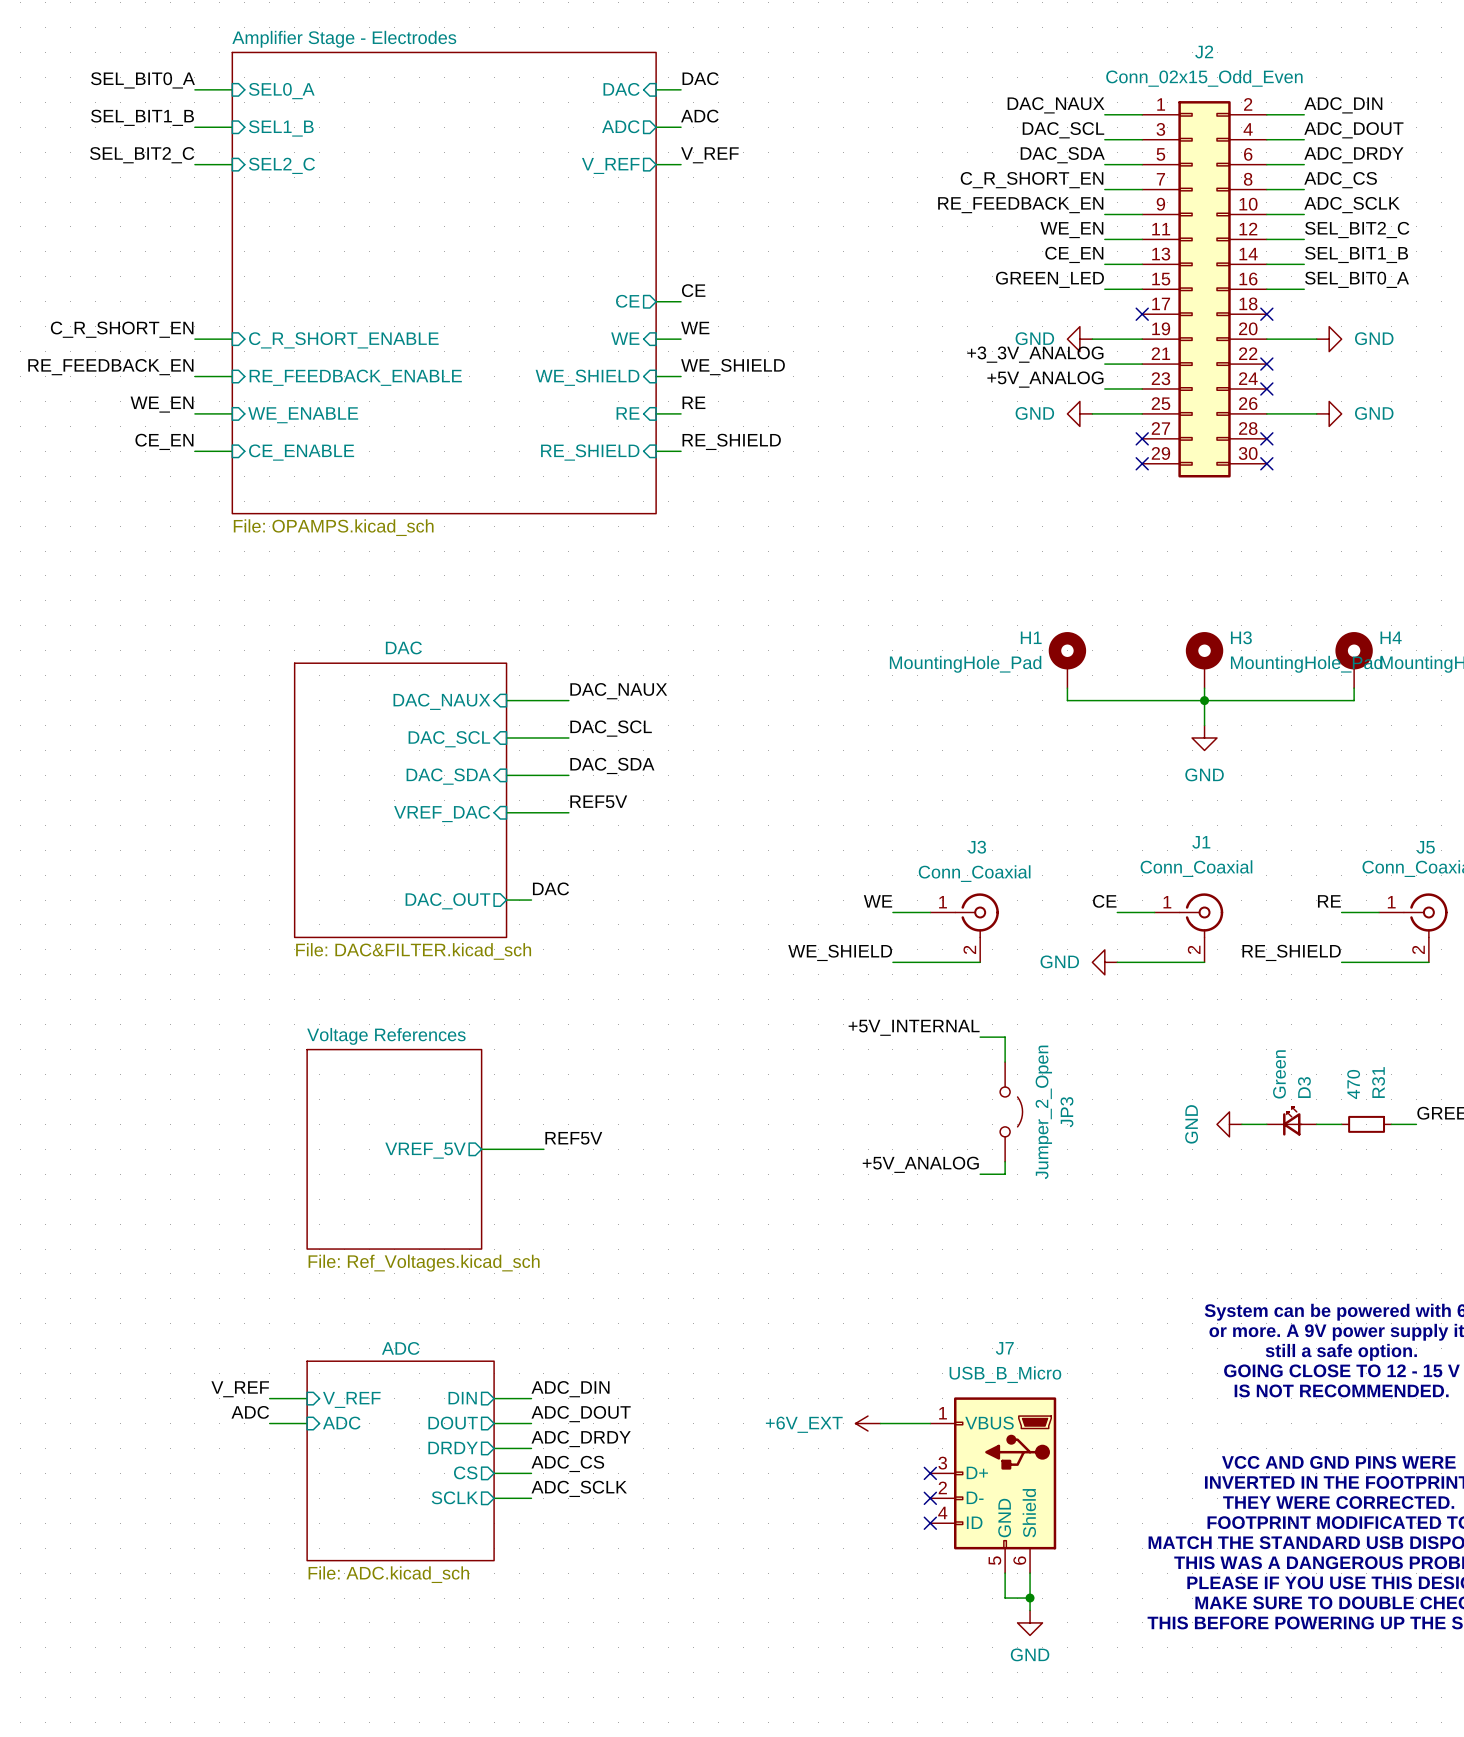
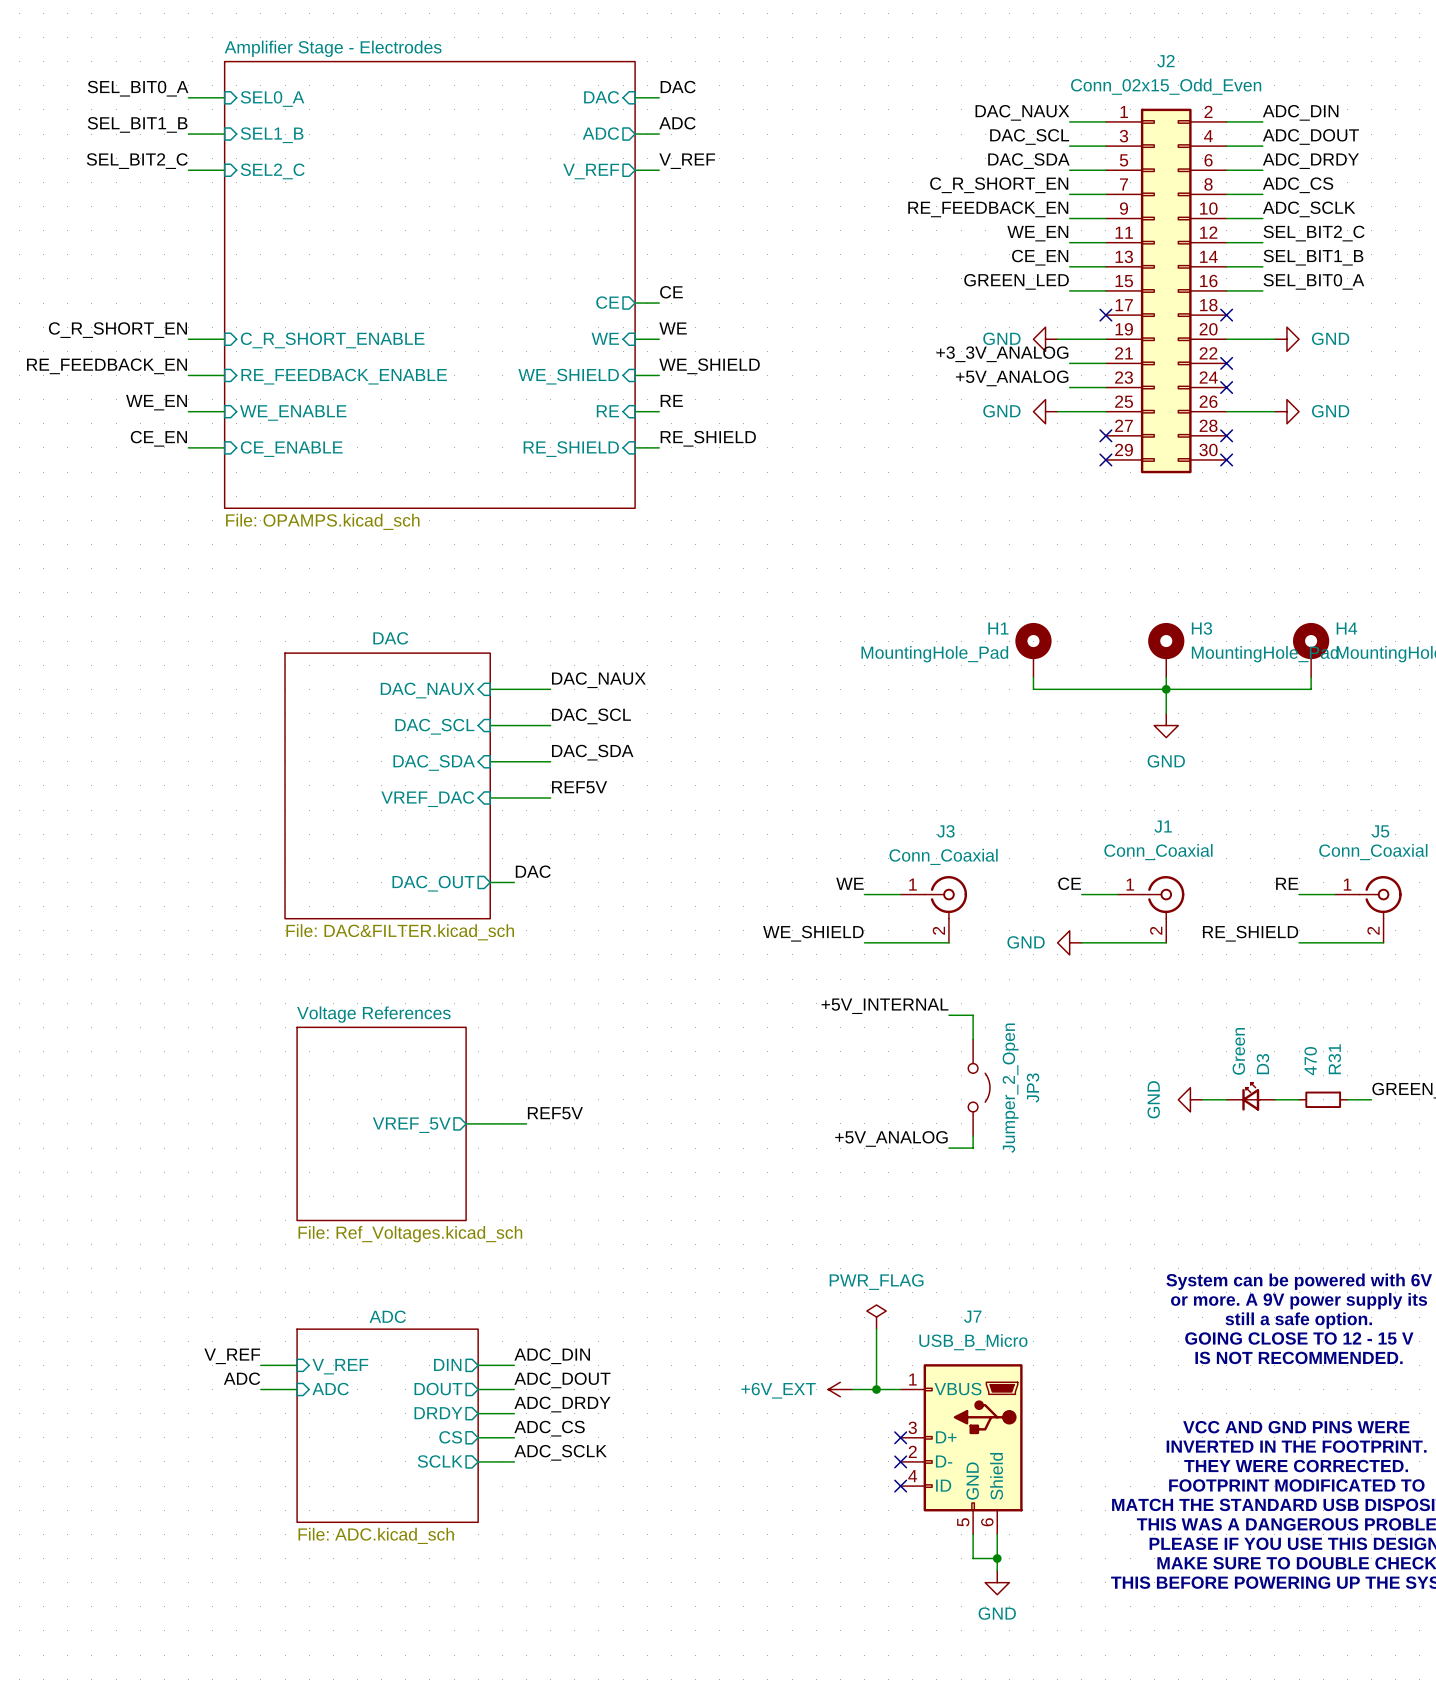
power symbol: none -> PWR_FLAG (876, 1317)
wire: none -> (876, 1329) (876, 1389)
junction: none -> (876, 1389)

